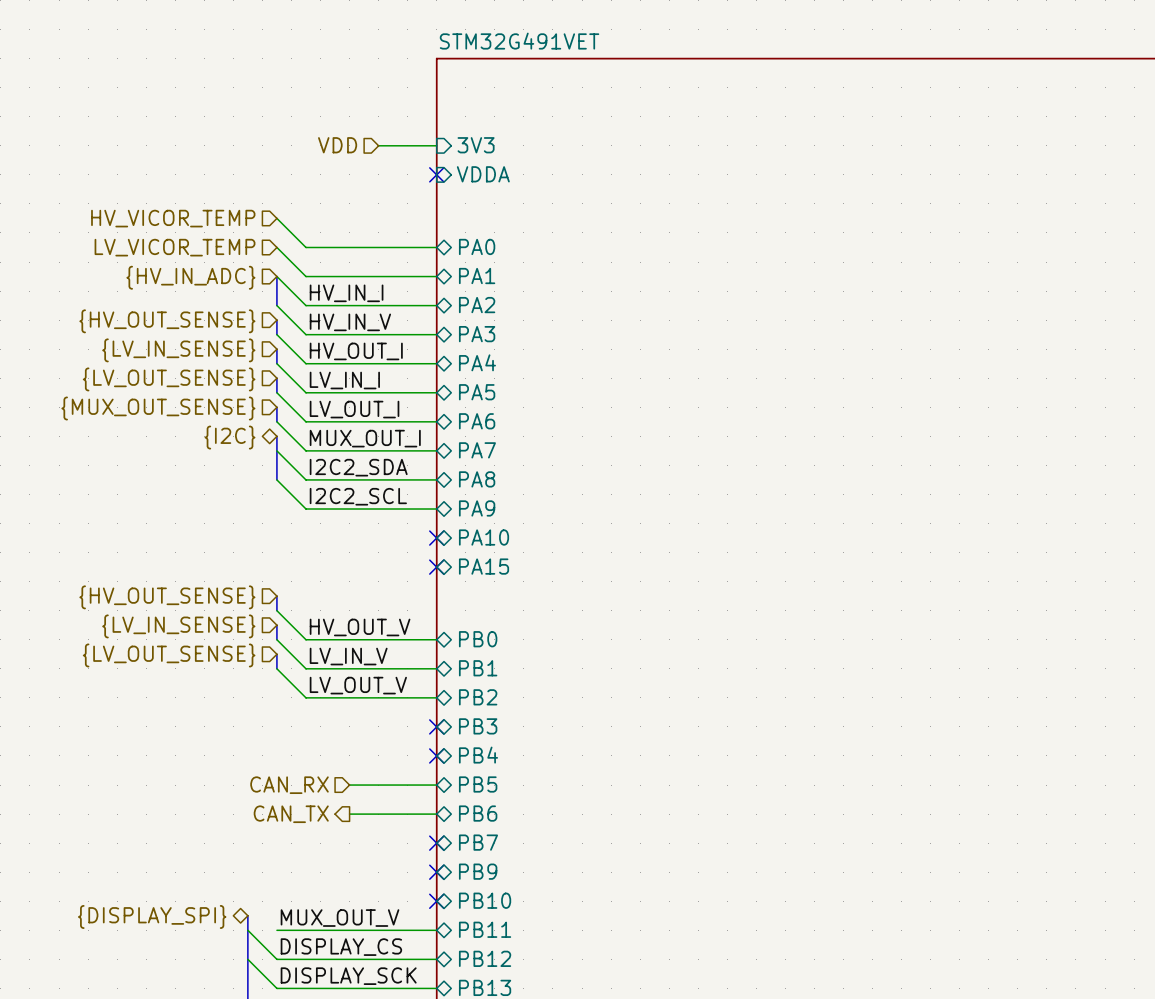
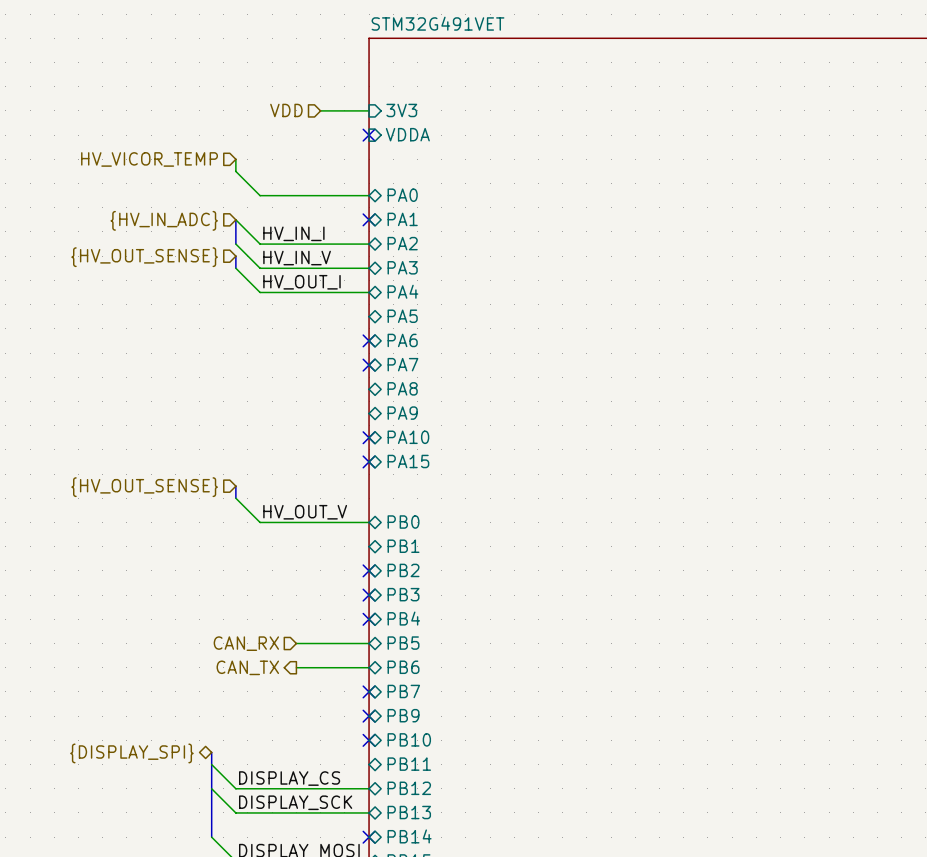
wire: none -> (235, 159) (235, 171)
hierarchical label position: HV_VICOR_TEMP (173, 218) -> HV_VICOR_TEMP (149, 159)
hierarchical label: LV_VICOR_TEMP (175, 247) -> none
wire: (276, 247) (305, 276) (436, 276) -> none
no-connect mark: none -> (369, 219)
bus: (276, 349) (276, 363) -> none
hierarchical label: {LV_IN_SENSE} (178, 350) -> none
wire: (276, 363) (305, 392) (436, 392) -> none
bus: (276, 378) (276, 392) -> none
hierarchical label: {LV_OUT_SENSE} (169, 379) -> none
label: LV_IN_I (344, 380) -> none
wire: (276, 392) (305, 421) (436, 421) -> none
bus: (276, 407) (276, 421) -> none
hierarchical label: {MUX_OUT_SENSE} (158, 408) -> none
label: LV_OUT_I (354, 409) -> none
wire: (276, 421) (305, 450) (436, 450) -> none
no-connect mark: none -> (369, 340)
bus: (276, 436) (276, 479) -> none
hierarchical label: {I2C} (230, 437) -> none
label: MUX_OUT_I (365, 438) -> none
wire: (276, 450) (305, 479) (436, 479) -> none
no-connect mark: none -> (369, 365)
label: I2C2_SDA (358, 467) -> none
wire: (276, 479) (305, 509) (436, 509) -> none
label: I2C2_SCL (358, 496) -> none
bus: (276, 625) (276, 639) -> none
hierarchical label: {LV_IN_SENSE} (178, 626) -> none
wire: (276, 639) (305, 668) (436, 668) -> none
bus: (276, 654) (276, 668) -> none
hierarchical label: {LV_OUT_SENSE} (169, 655) -> none
label: LV_IN_V (348, 656) -> none
wire: (276, 668) (305, 697) (436, 697) -> none
label: LV_OUT_V (358, 685) -> none
no-connect mark: none -> (369, 570)
label: MUX_OUT_V (340, 918) -> none
wire: (276, 930) (436, 930) -> none

